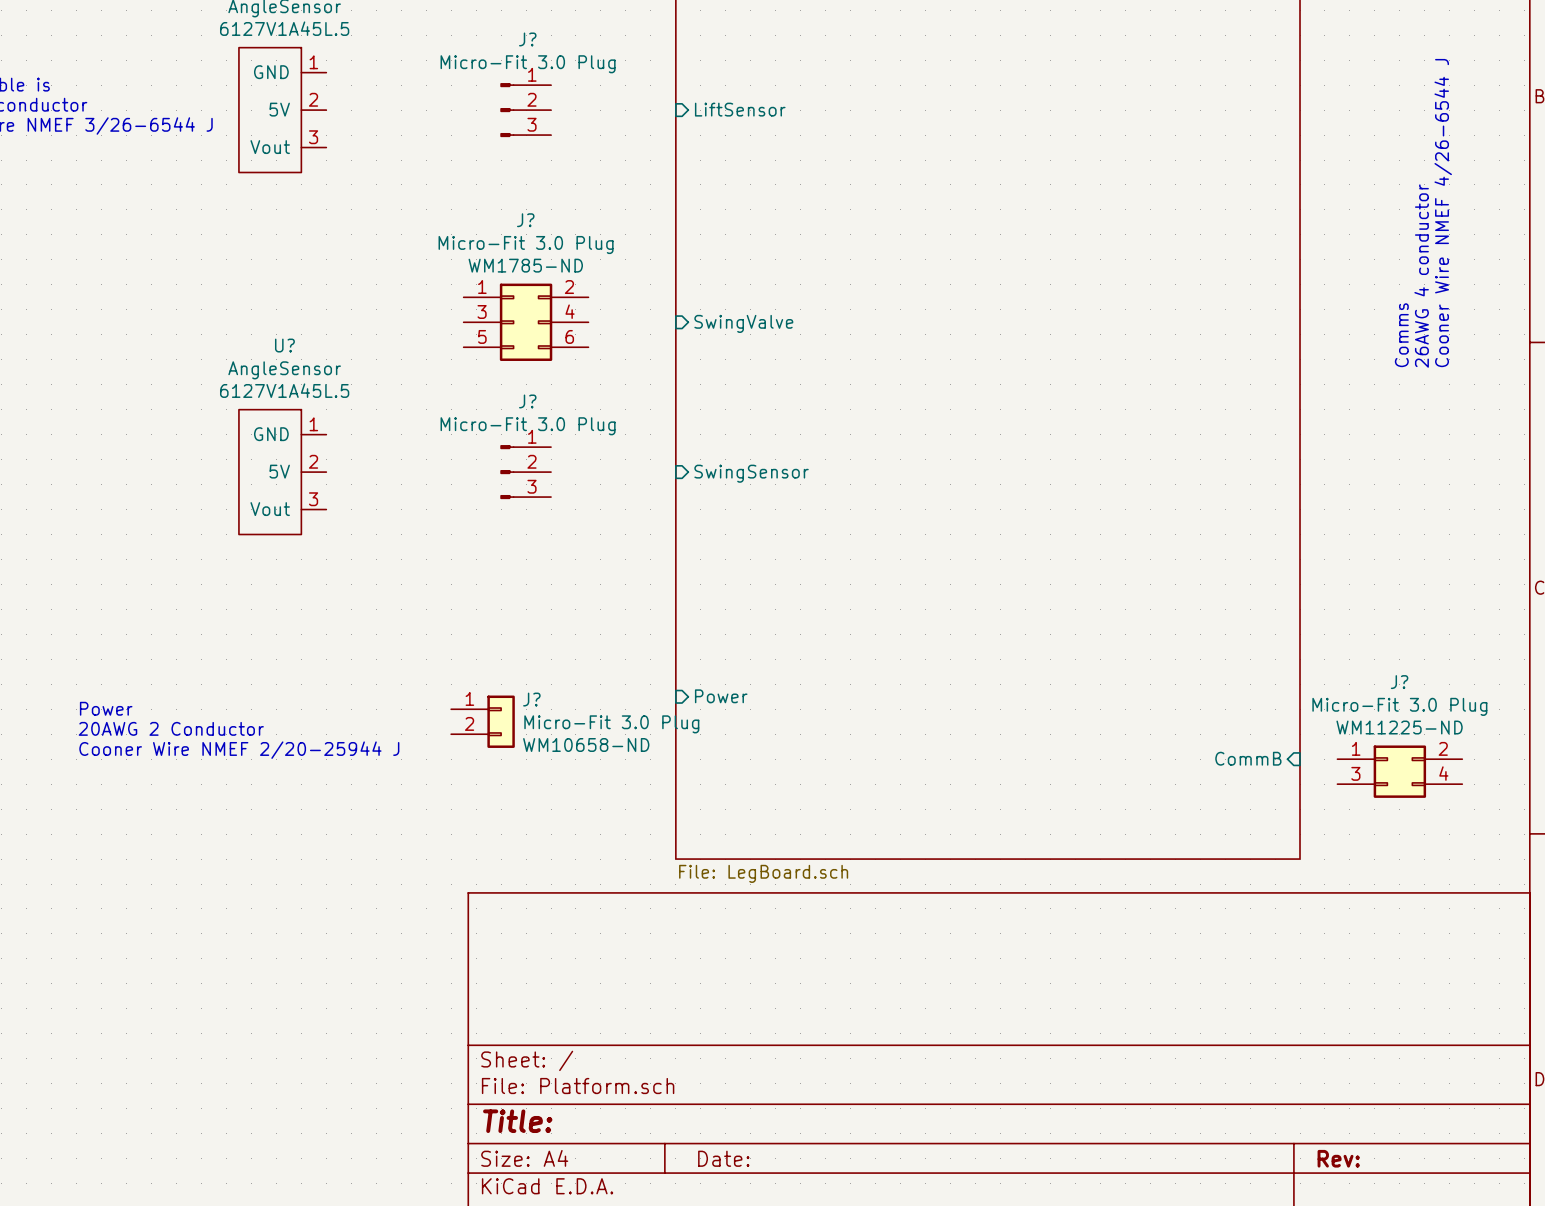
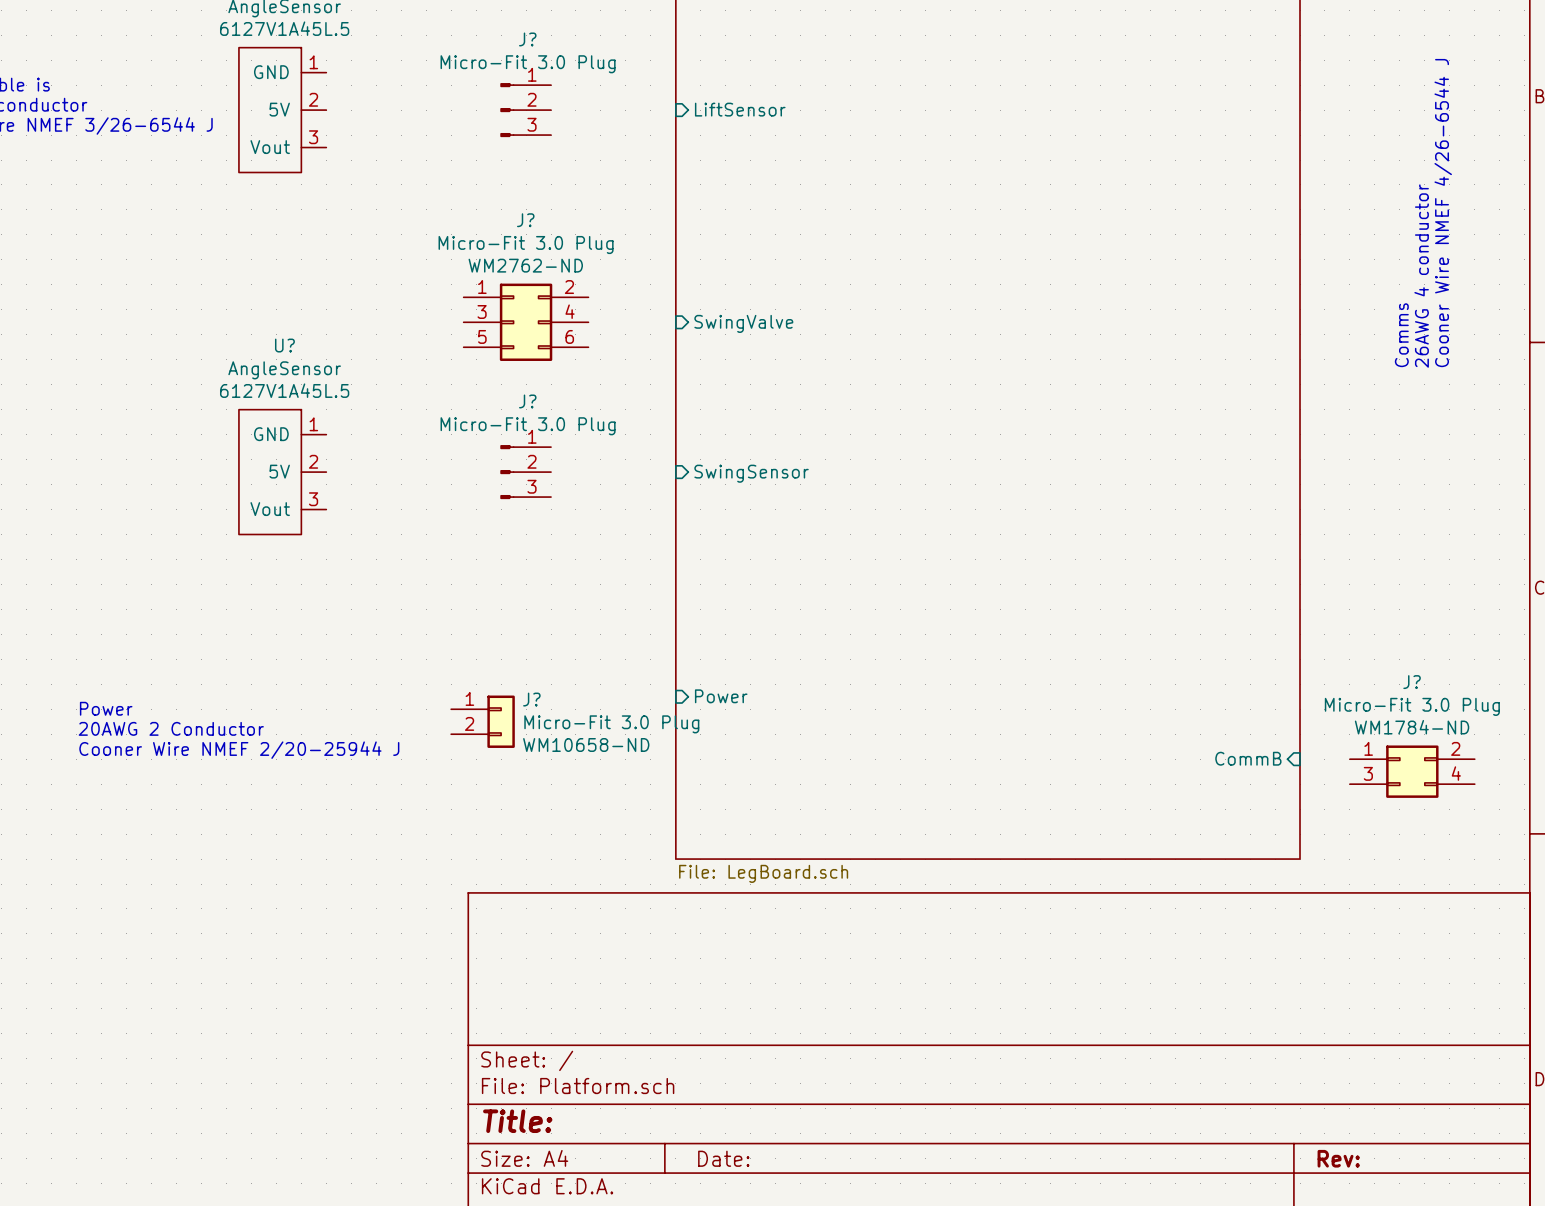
J? text: WM1785-ND (525, 265) -> WM2762-ND (525, 265)
J?: Micro-Fit 3.0 Plug (1399, 771) -> none
J?: none -> Micro-Fit 3.0 Plug (1412, 771)

